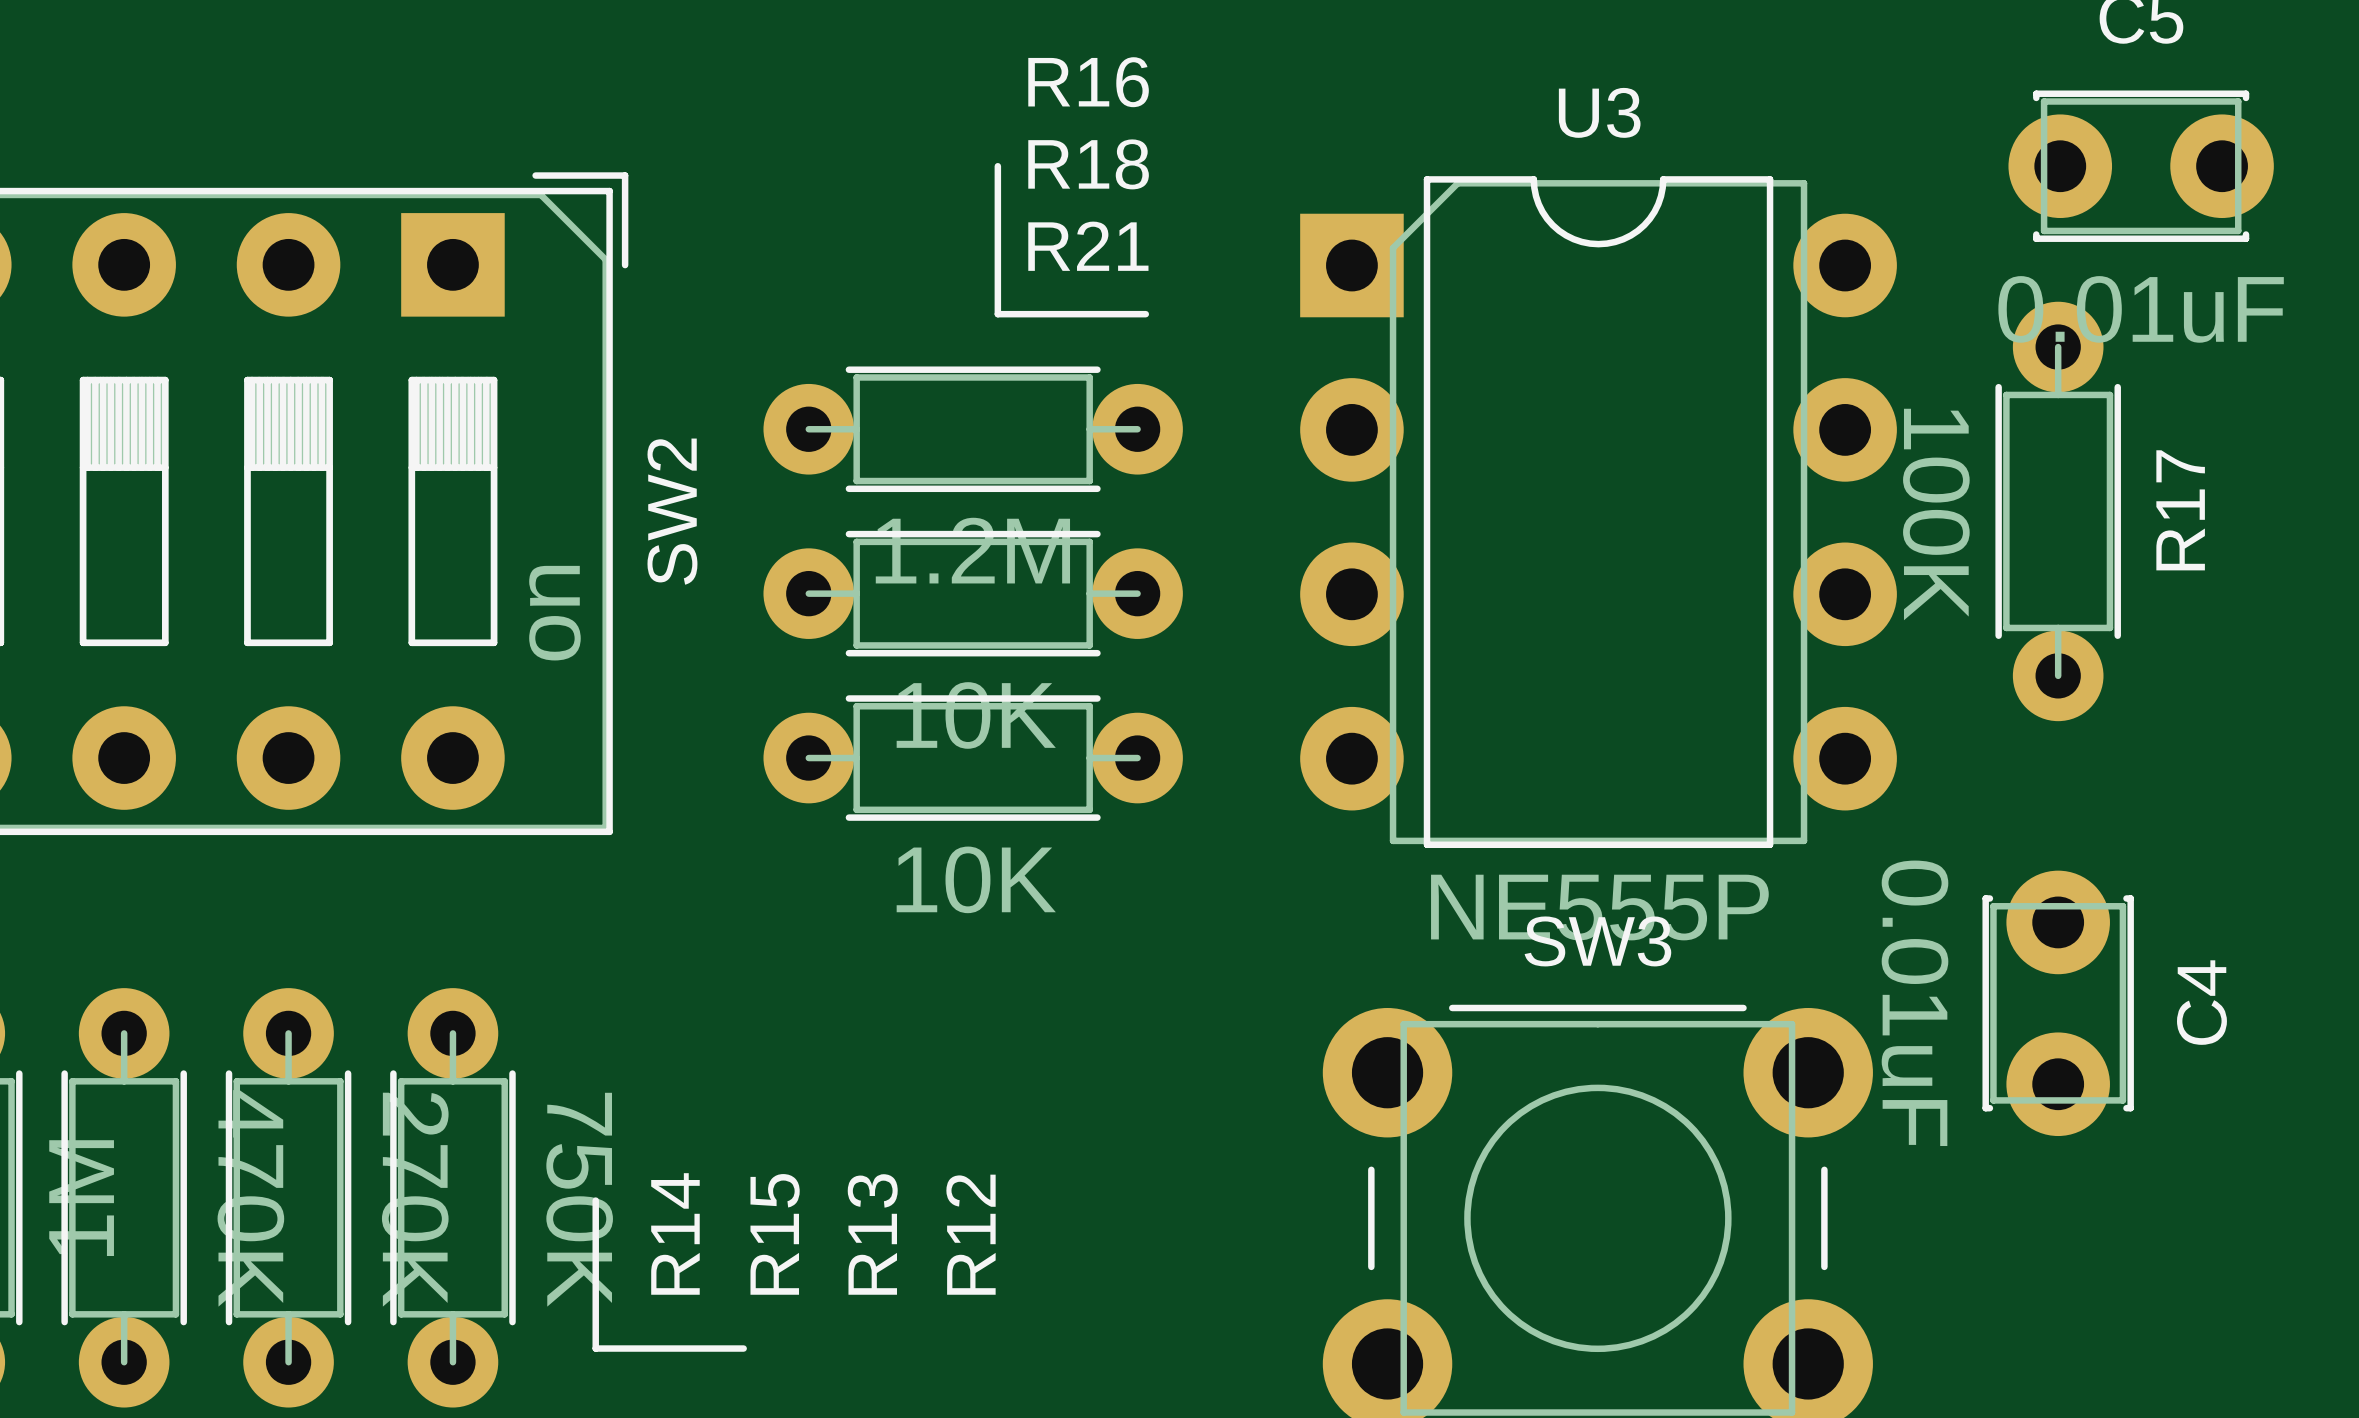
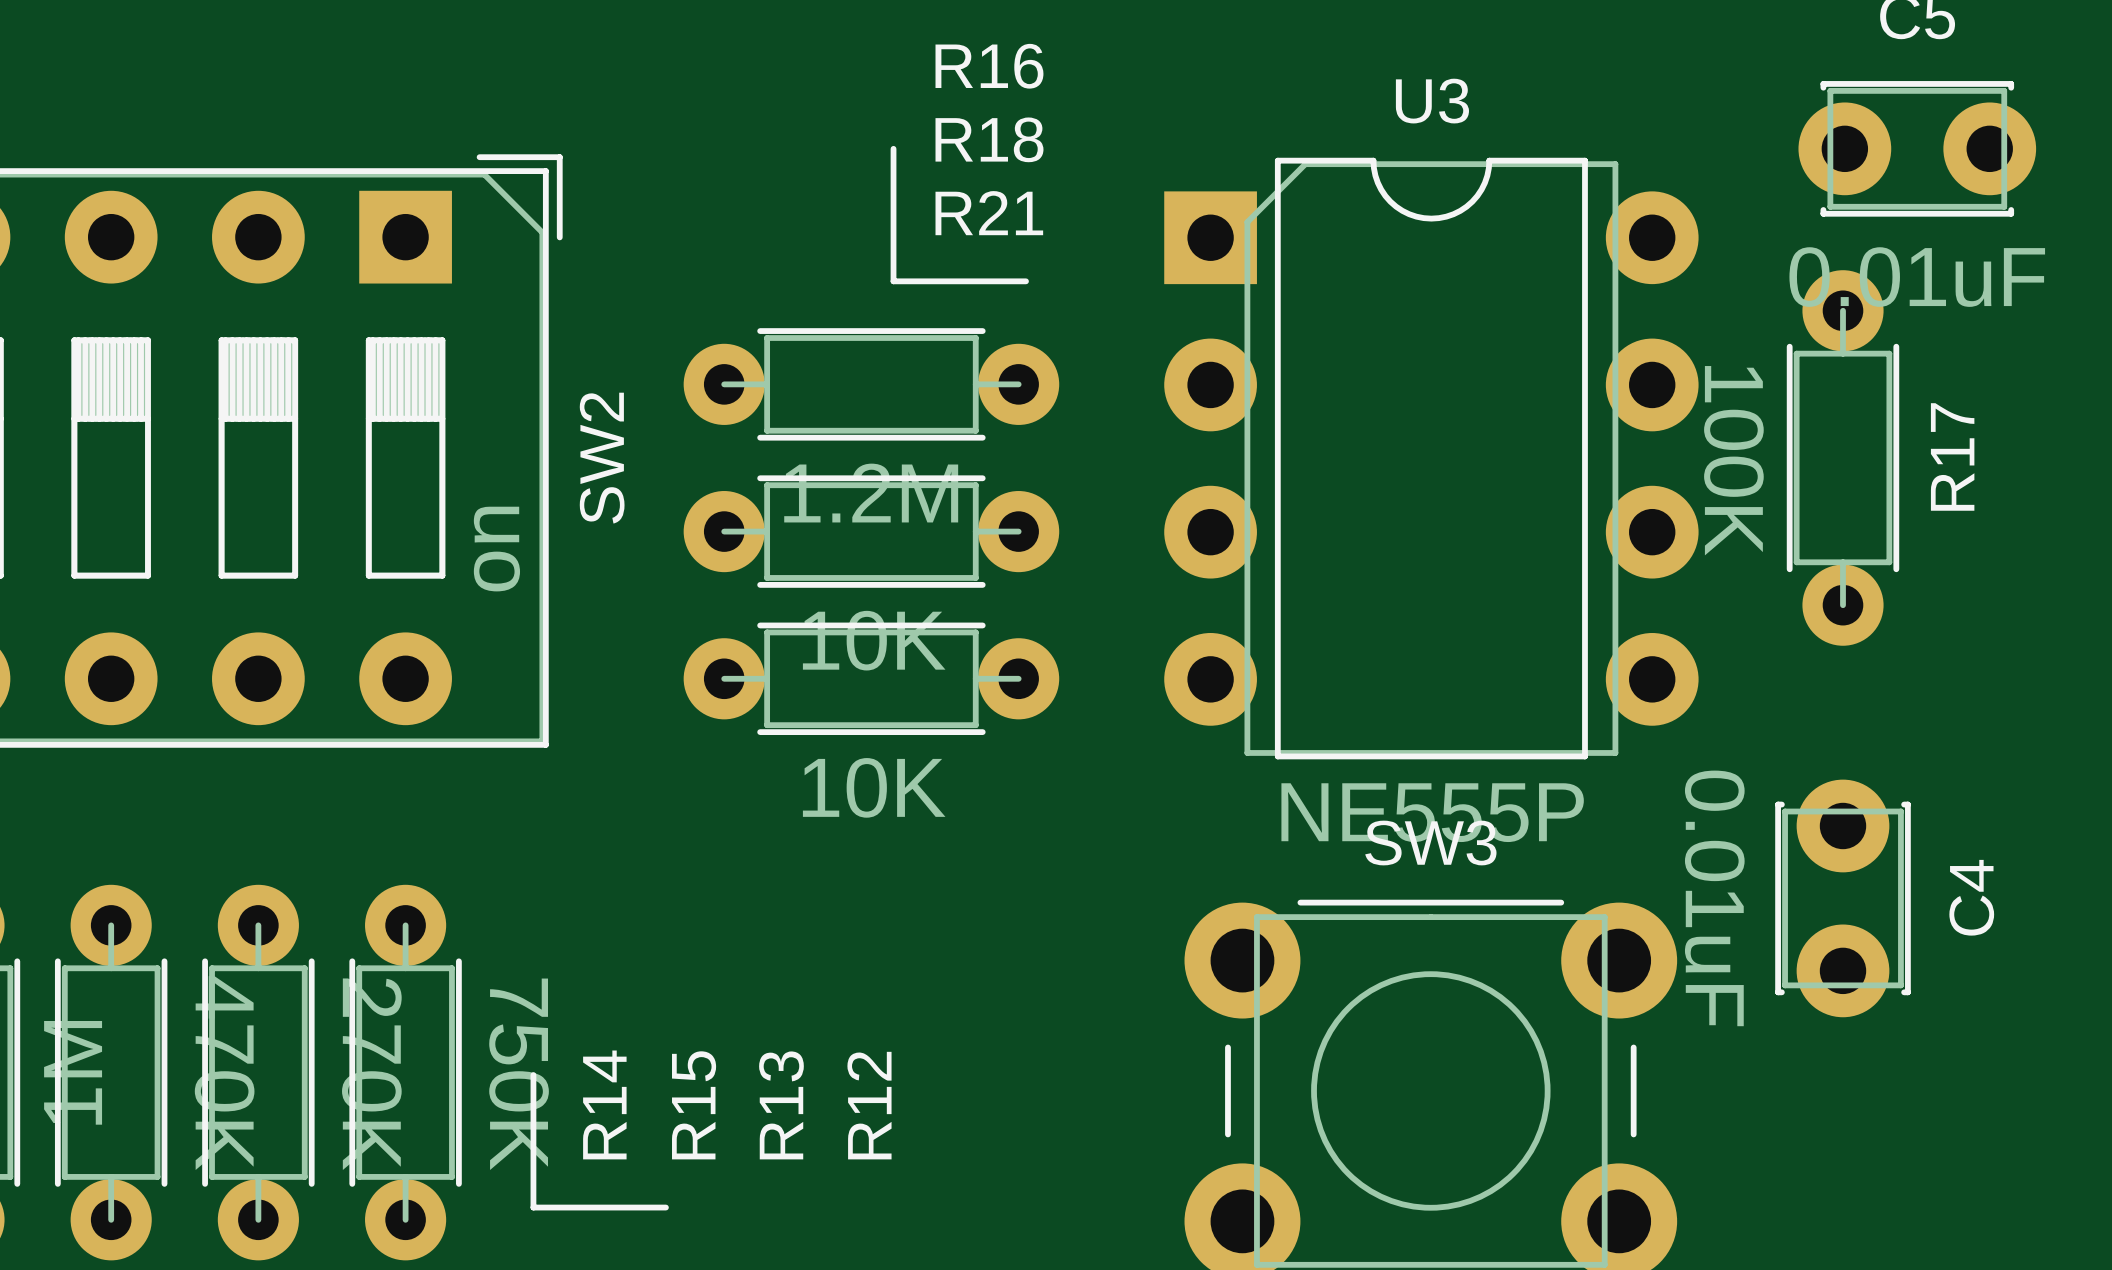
R16 name position: R16 (1088, 82) -> R16 (989, 66)
R18 name position: R18 (1088, 164) -> R18 (989, 139)
R21 name position: R21 (1088, 246) -> R21 (989, 213)

